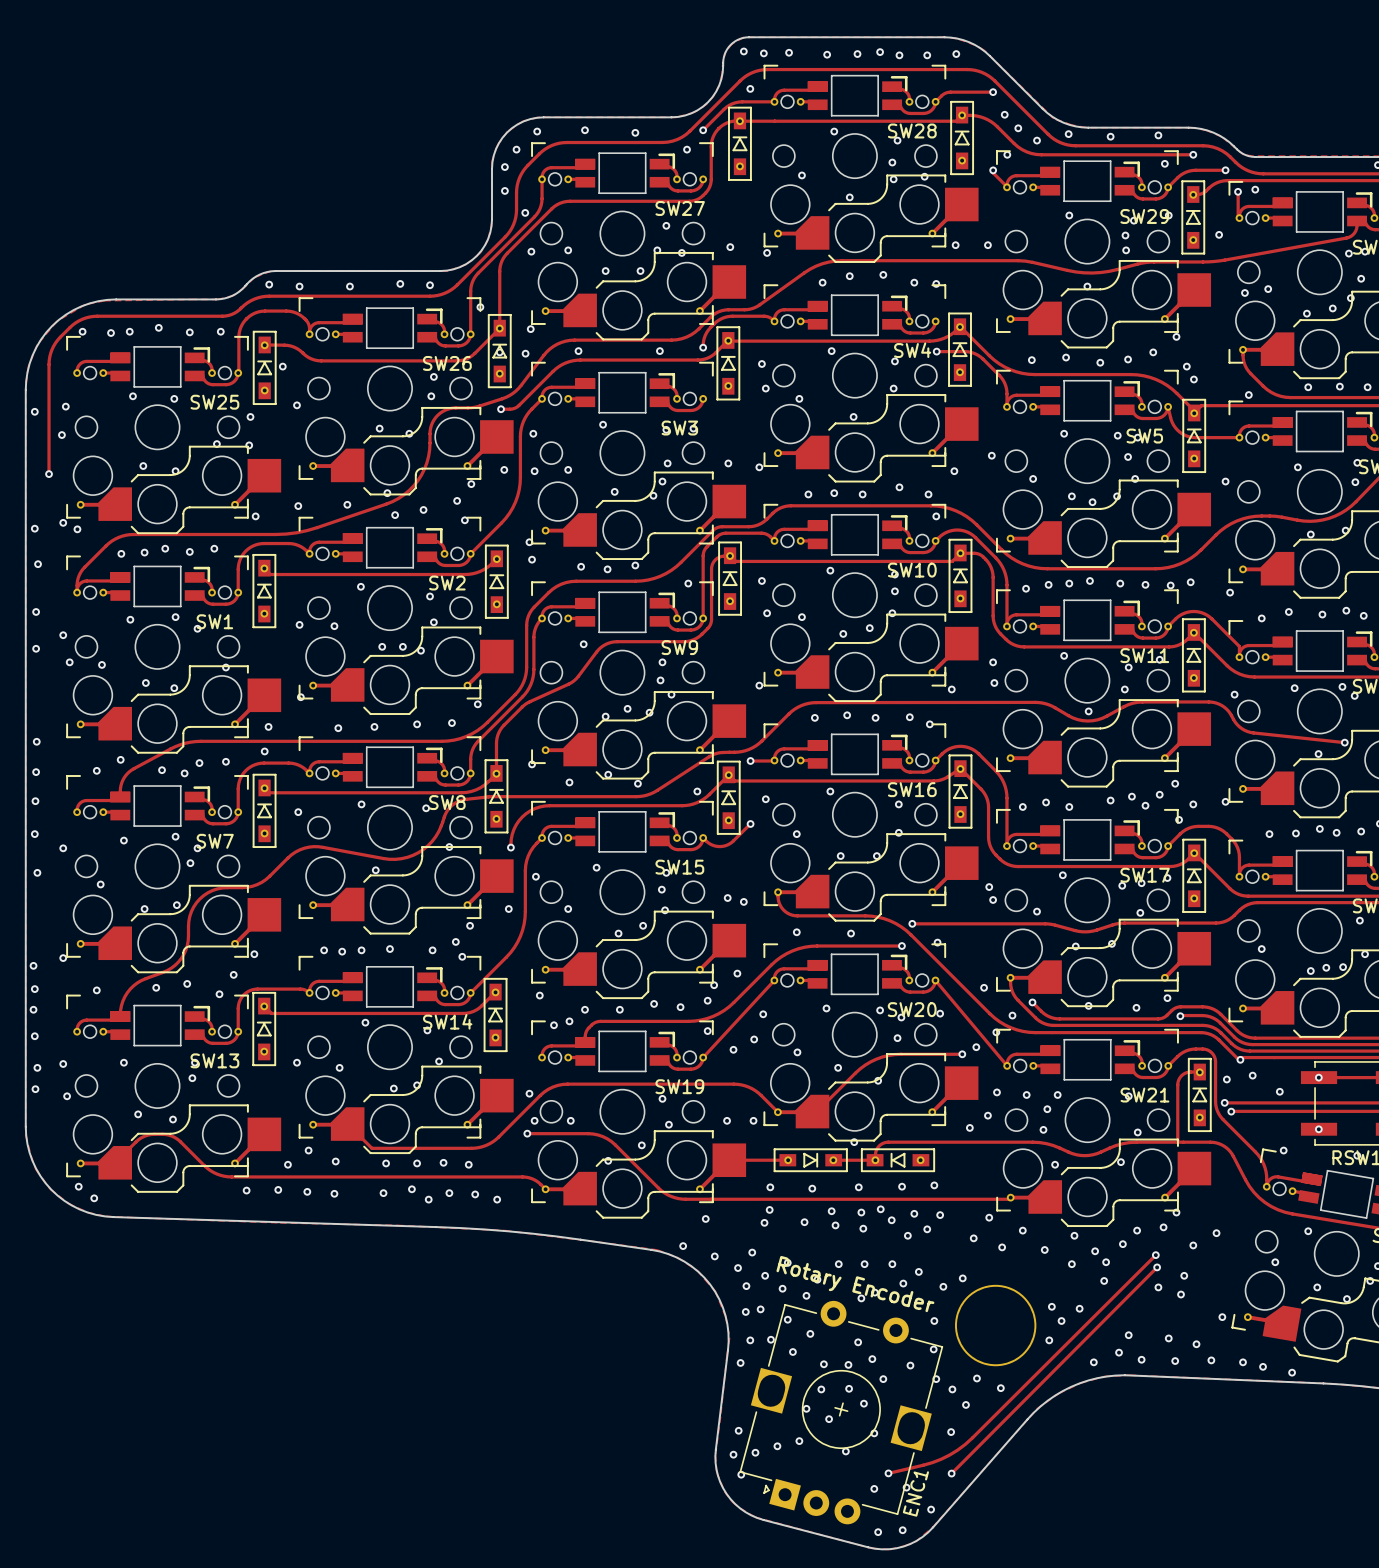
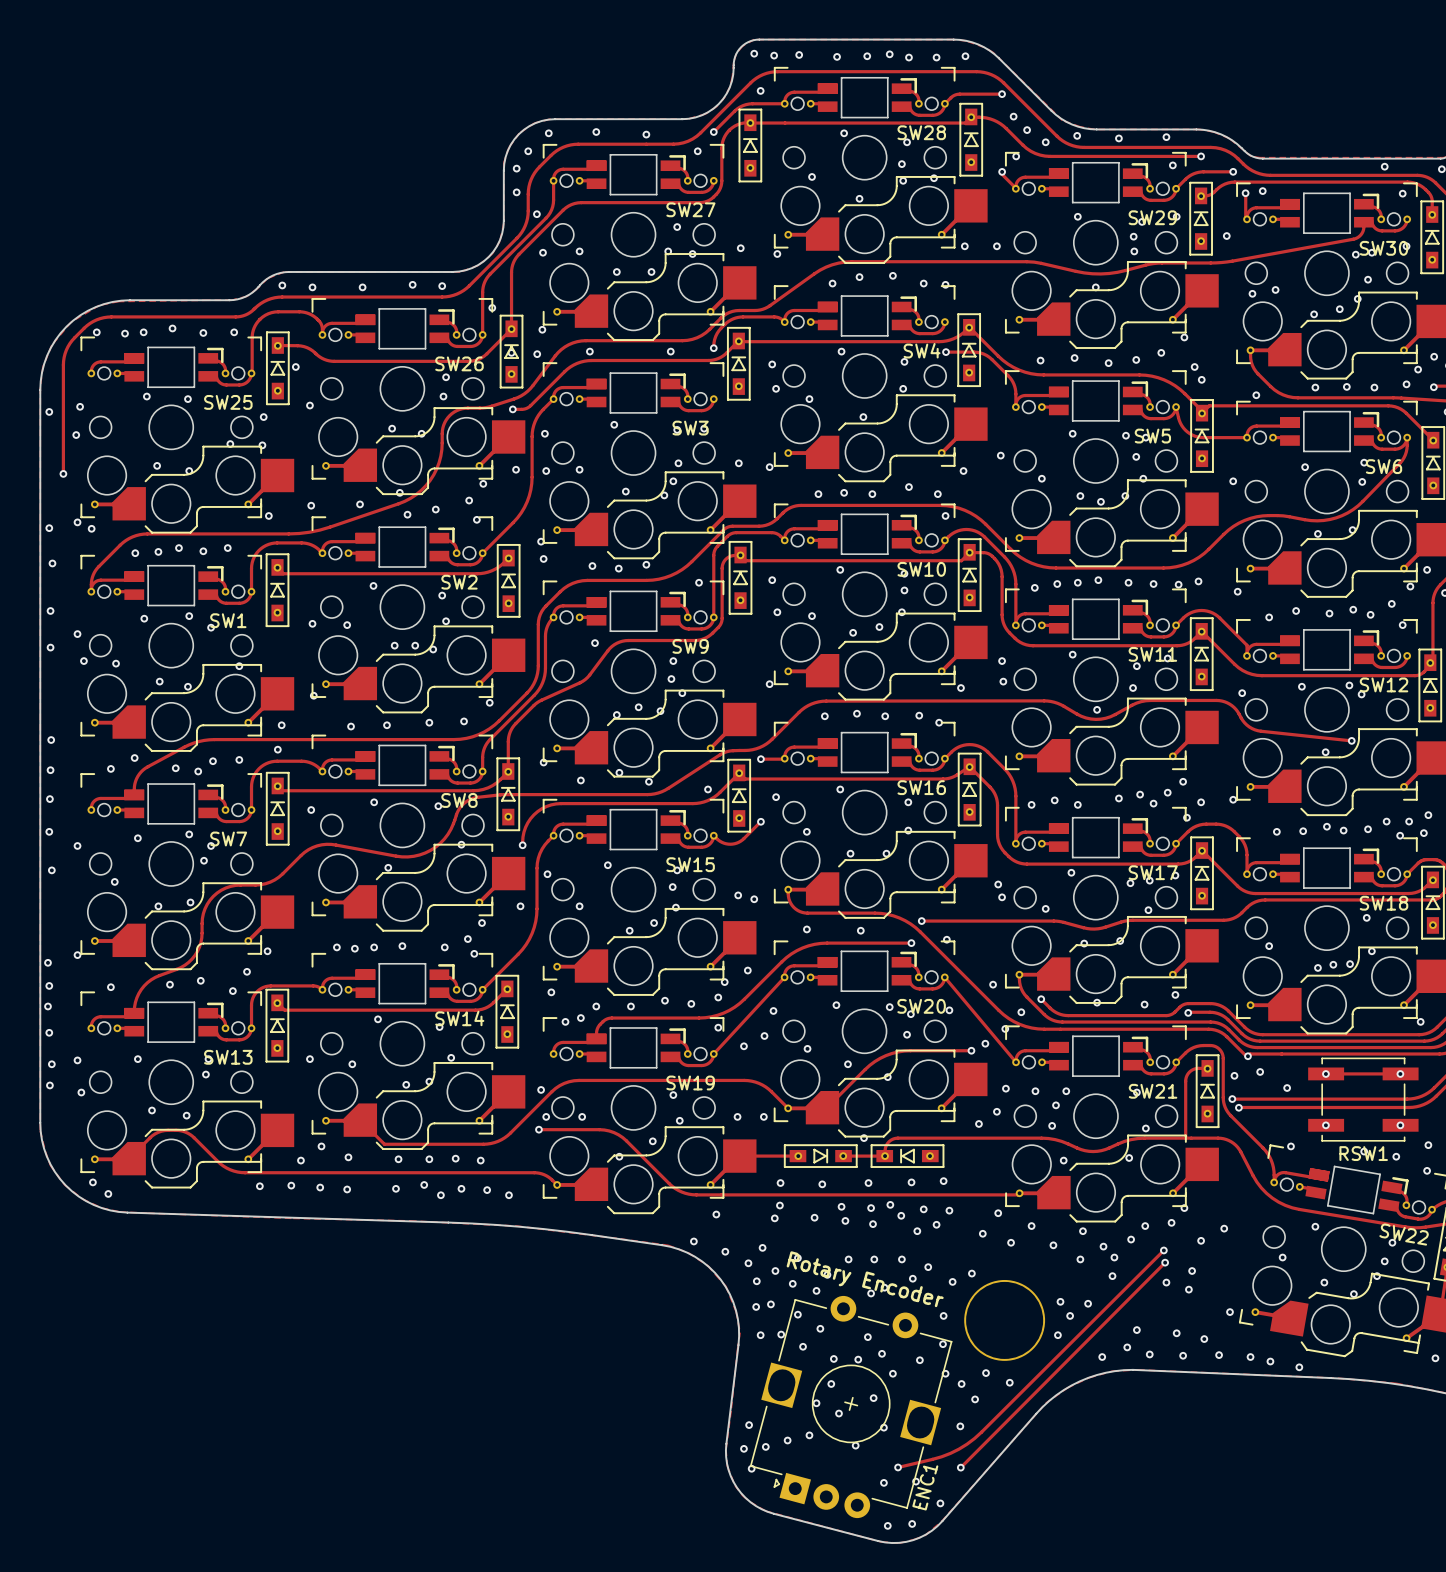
via: (740, 1362) -> none
via: (849, 1388) -> none

